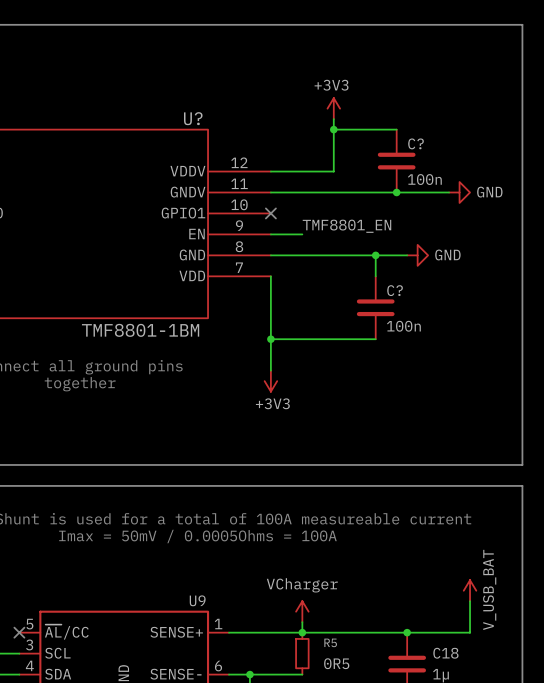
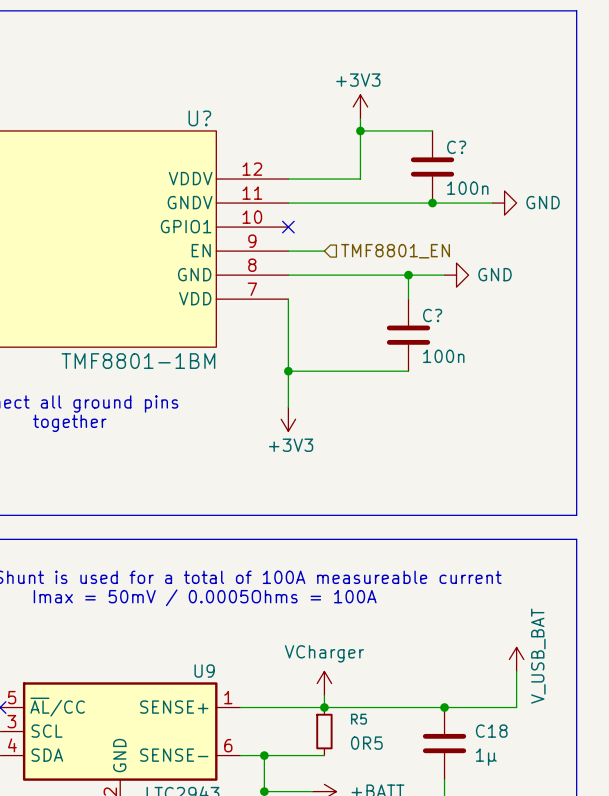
label: TMF8801_EN (346, 226) -> none
hierarchical label: none -> TMF8801_EN (395, 251)

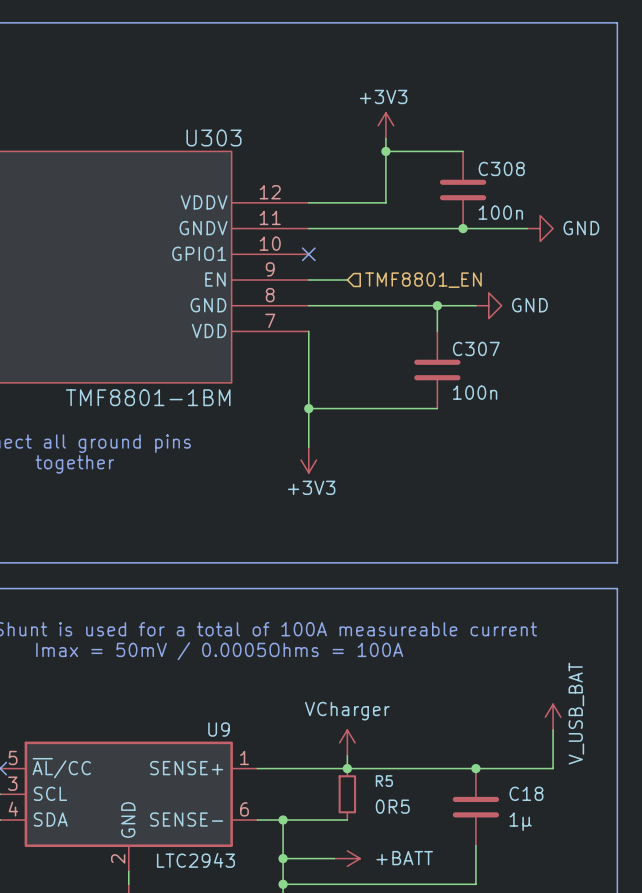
U? name: U? (199, 118) -> U303 (214, 137)
C? name: C? (456, 147) -> C308 (501, 168)
C? name: C? (432, 315) -> C307 (476, 348)

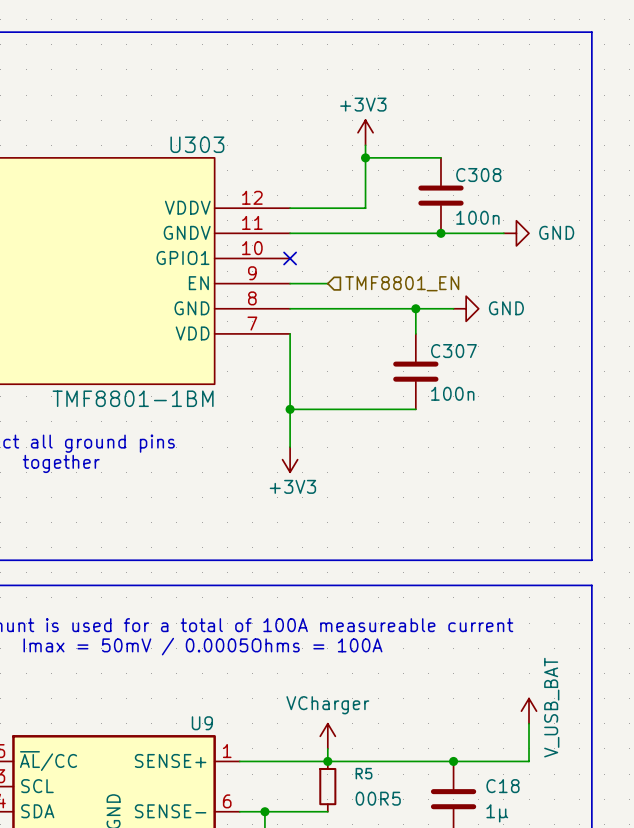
R5 value: 0R5 (392, 806) -> 00R5 (378, 798)

